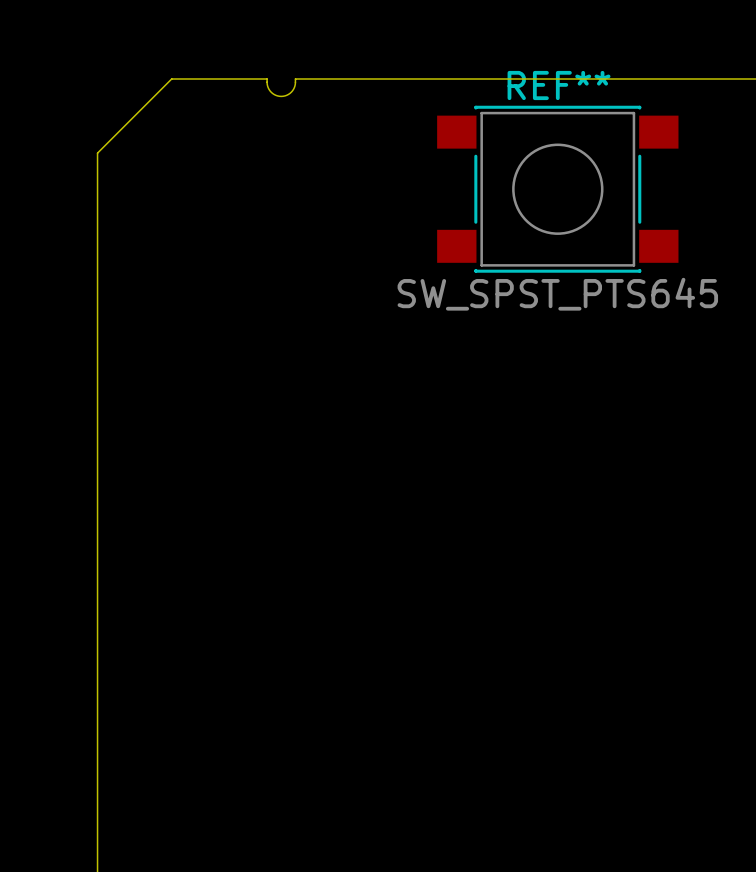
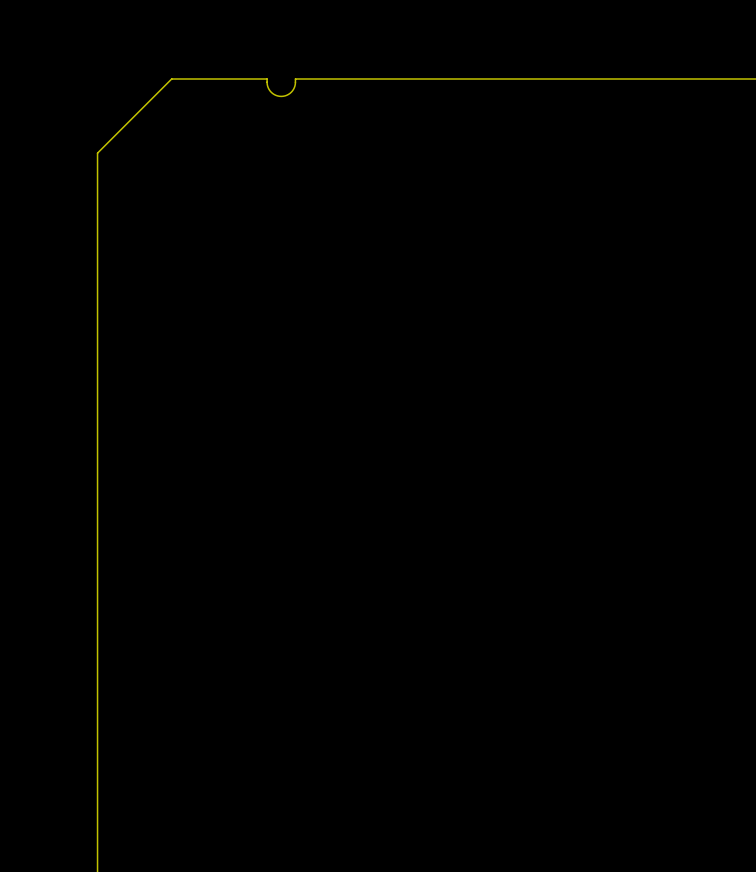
REF**: SW_SPST_PTS645 (557, 189) -> none

